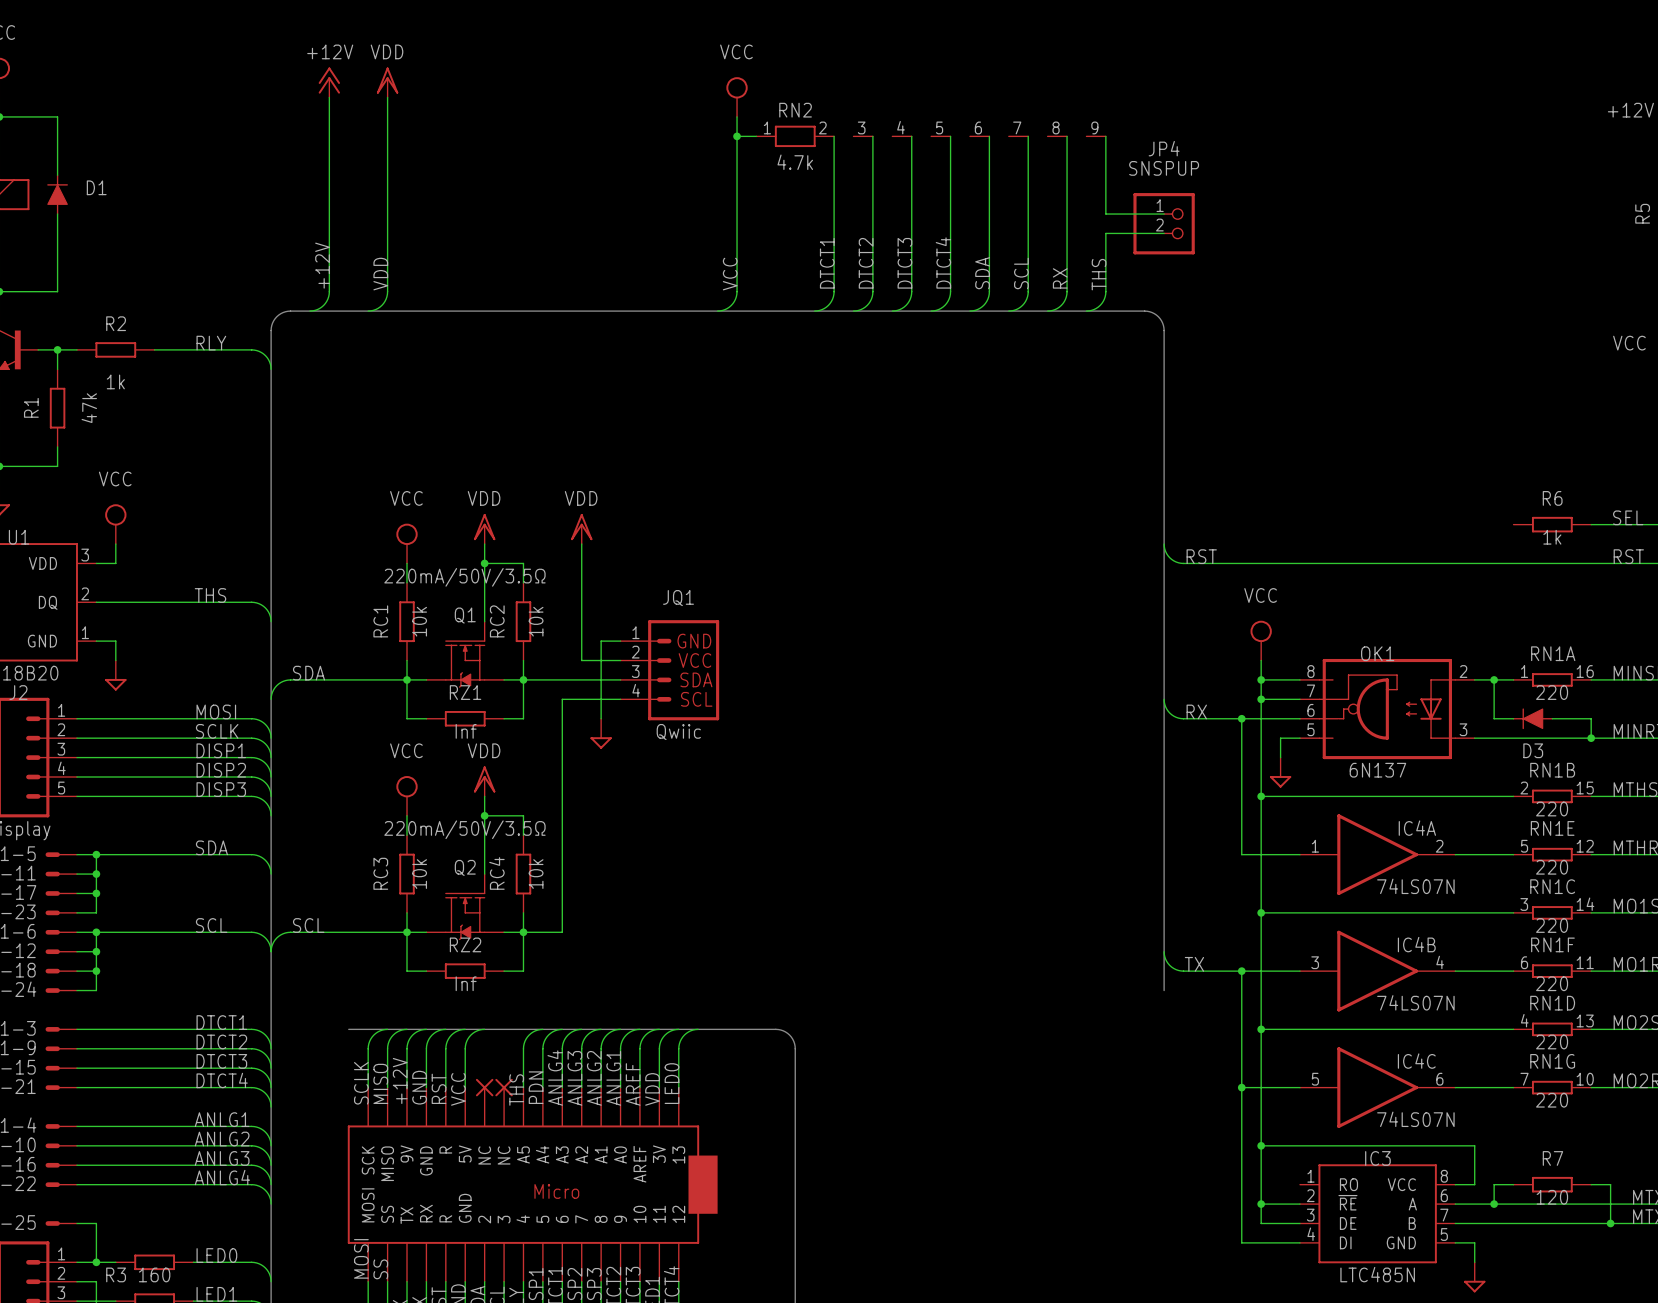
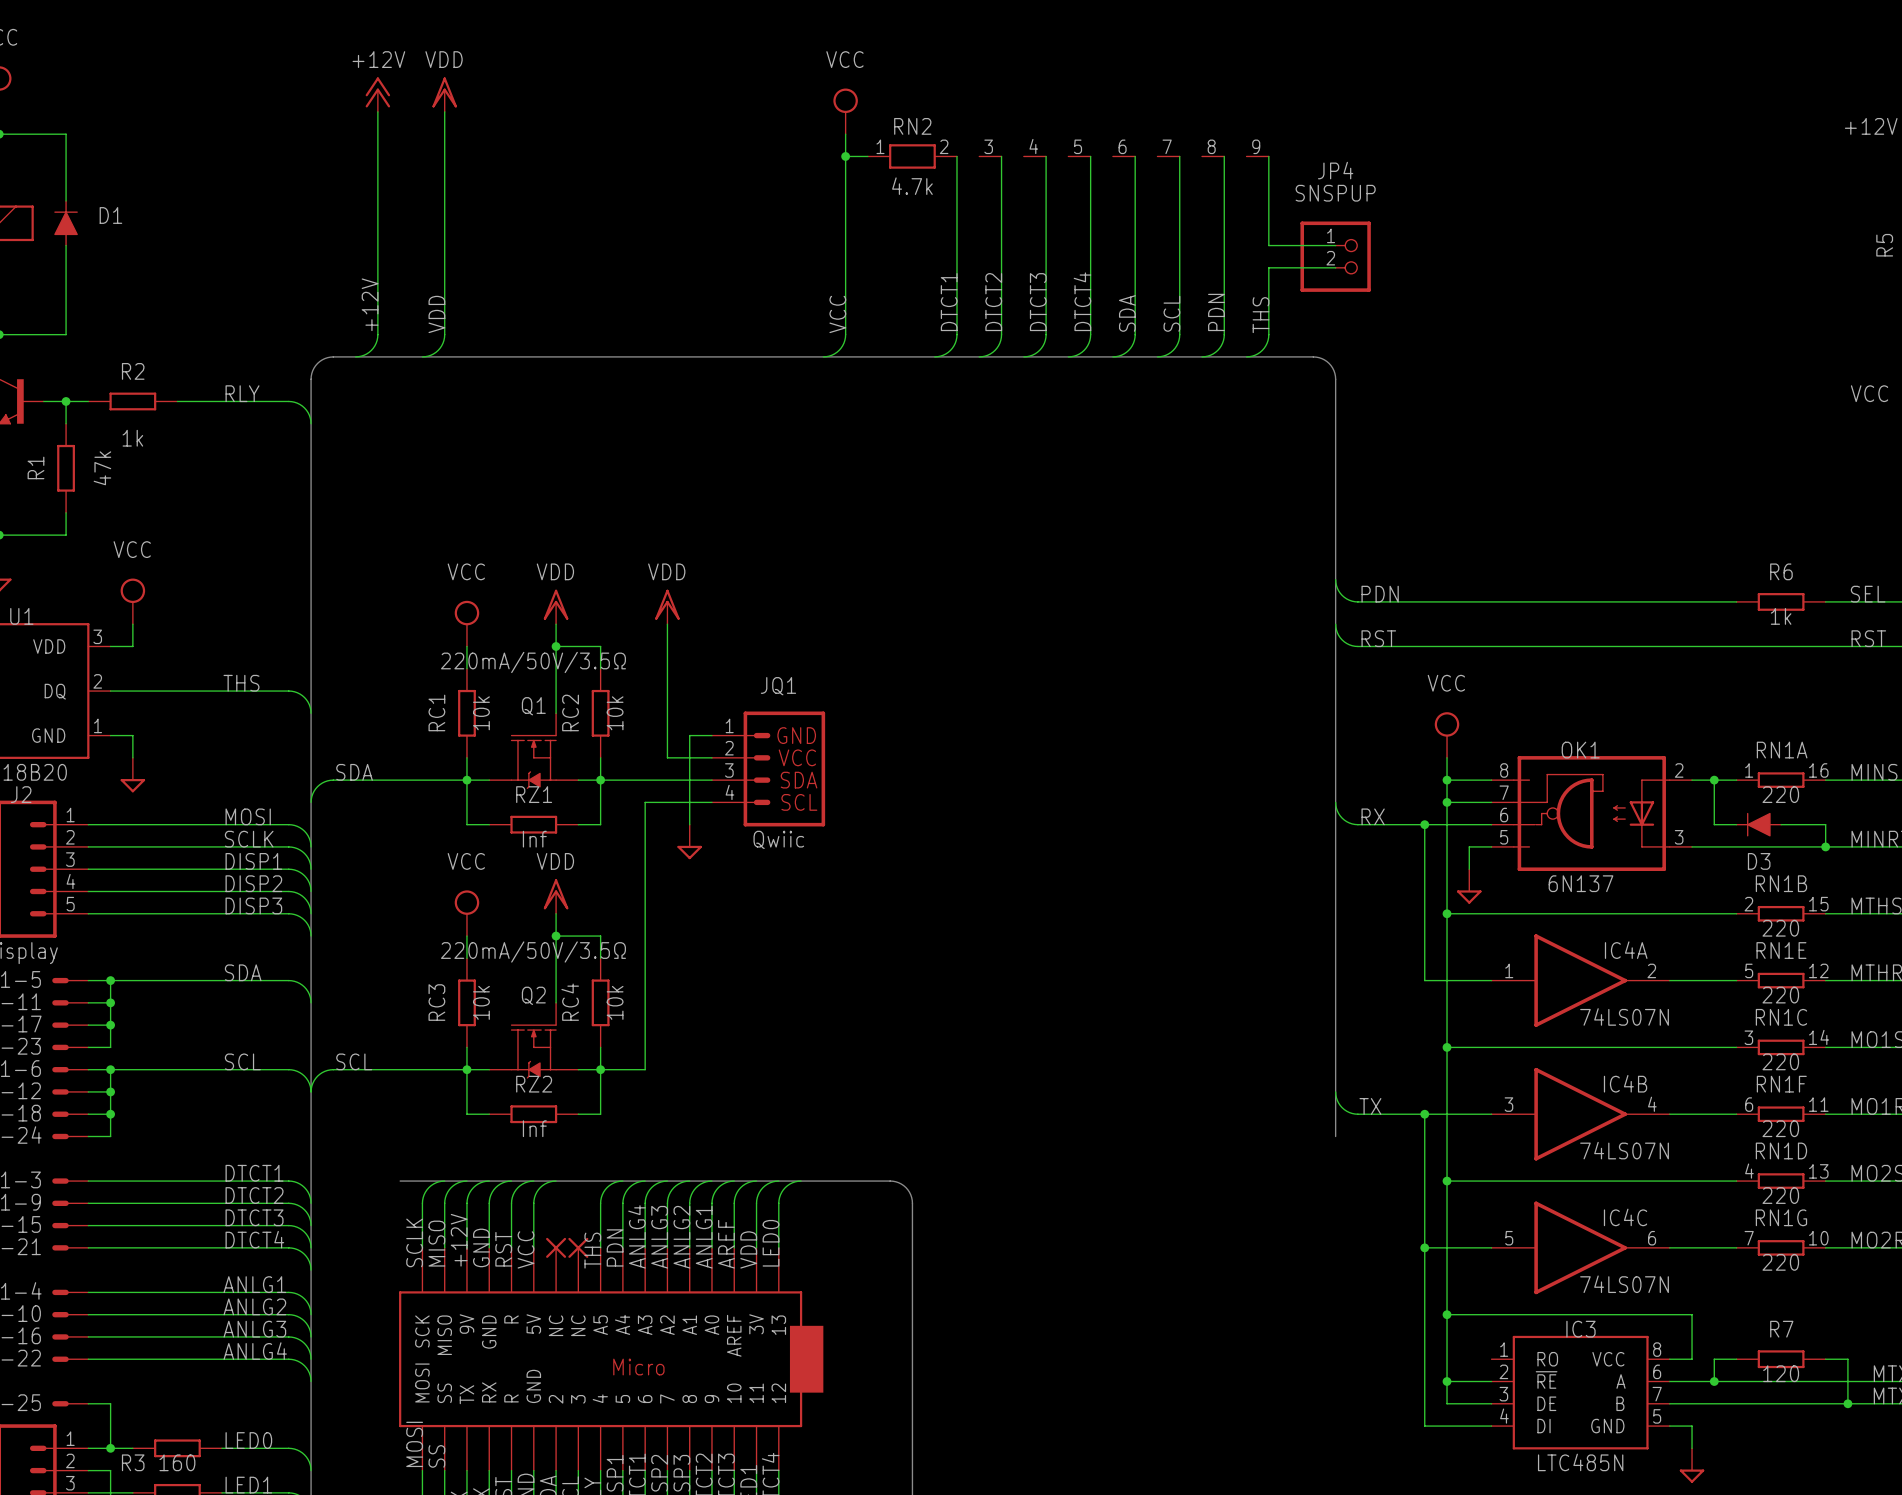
label: RX (1060, 278) -> PDN (1216, 312)
wire: none -> (1335, 579) (1337, 588) (1342, 595) (1349, 600) (1357, 601) (1736, 601)
label: none -> PDN (1380, 594)

